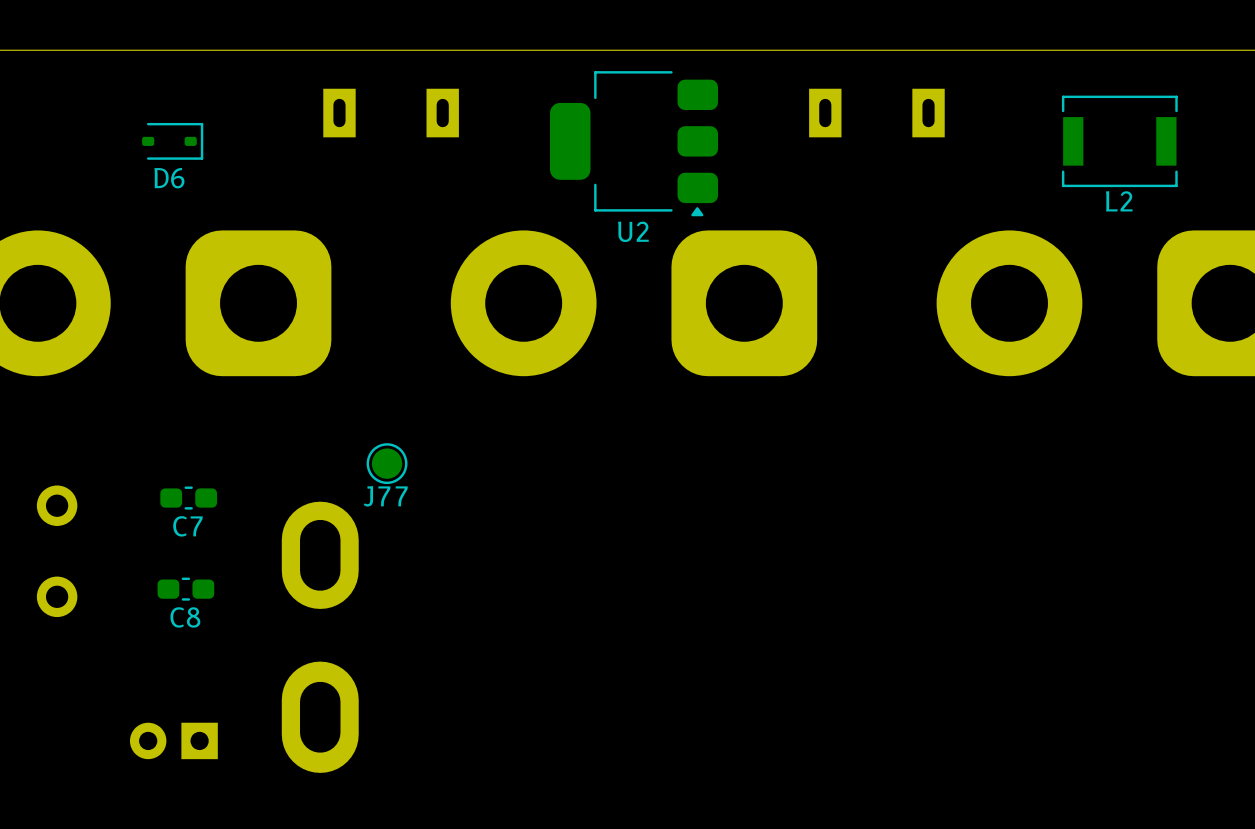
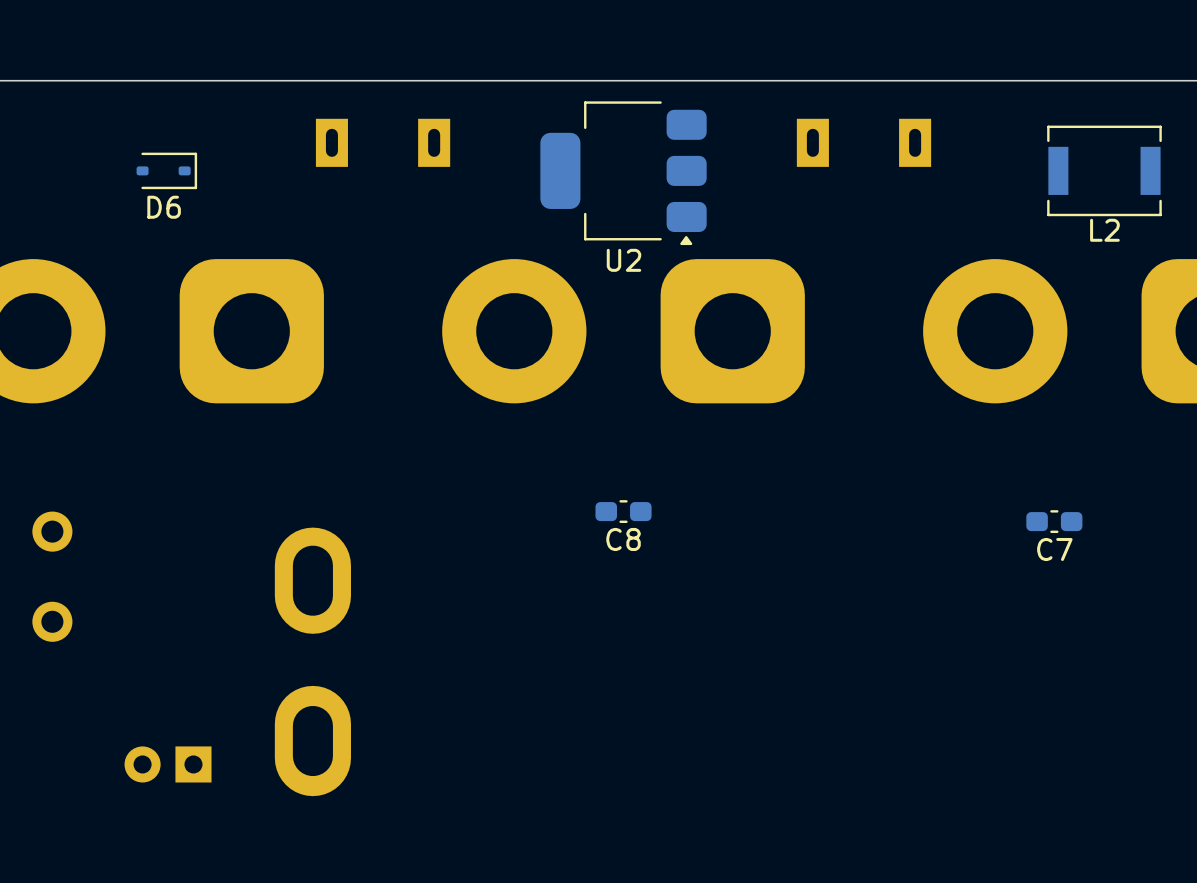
J77: (387, 463) -> none
C7 position: (188, 498) -> (1054, 521)
C8 position: (185, 589) -> (623, 511)

